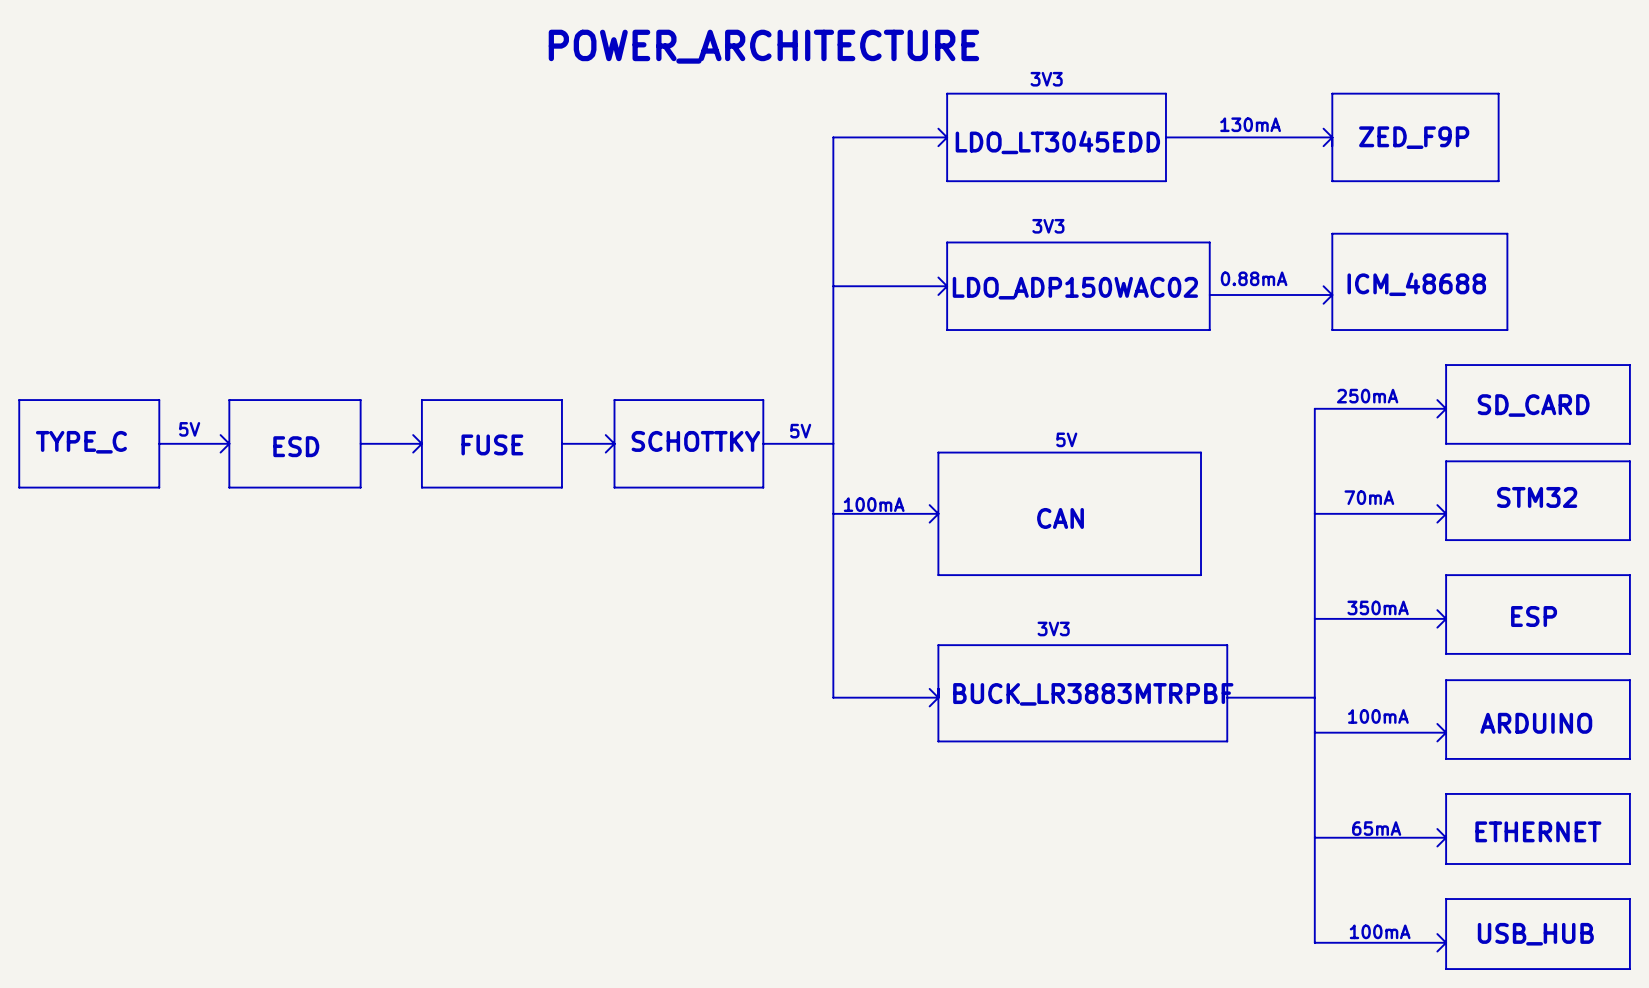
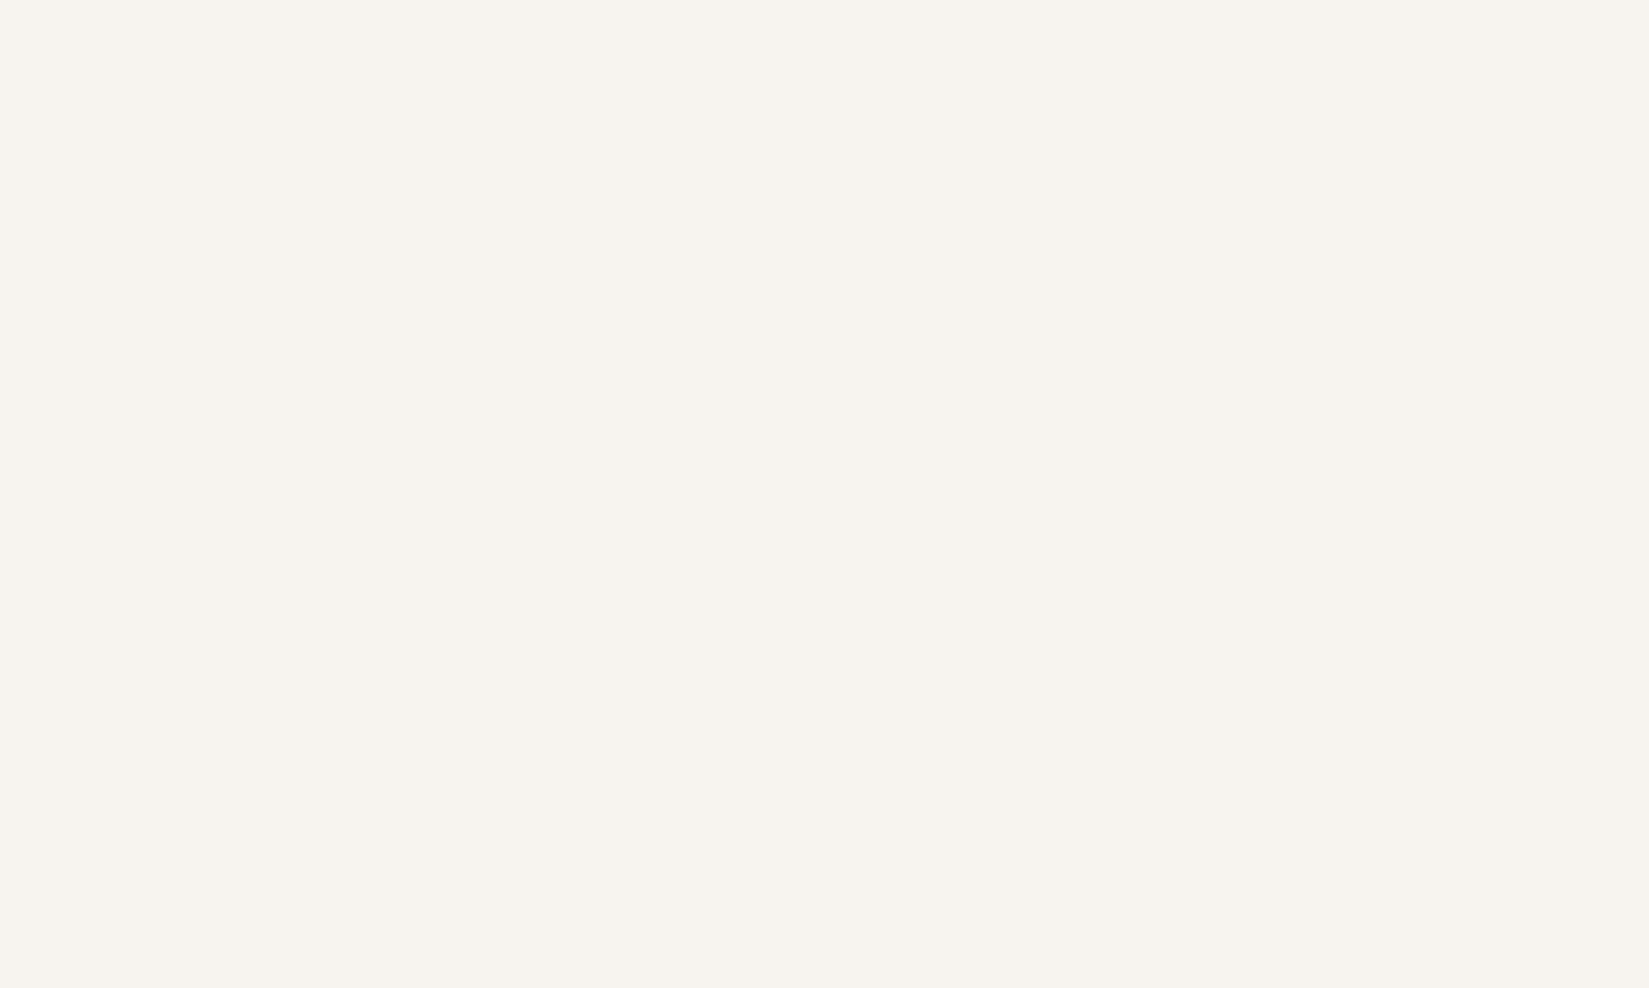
text: POWER_ARCHITECTURE (763, 46) -> none
text: 3V3 (1046, 79) -> none
line: (947, 93) (1165, 93) (1165, 181) (947, 181) (947, 93) -> none
line: (1332, 93) (1332, 181) (1498, 181) (1498, 93) (1332, 93) -> none
text: 130mA (1250, 124) -> none
line: (938, 128) (947, 137) -> none
line: (1323, 128) (1332, 137) -> none
line: (947, 137) (938, 146) -> none
line: (947, 137) (833, 137) (833, 697) (938, 697) -> none
line: (1165, 137) (1332, 137) -> none
line: (1332, 137) (1323, 146) -> none
text: ZED_F9P (1414, 137) -> none
text: LDO_LT3045EDD (1057, 142) -> none
text: 3V3 (1048, 226) -> none
line: (1332, 233) (1332, 330) (1507, 330) (1507, 233) (1332, 233) -> none
line: (947, 242) (947, 330) (1209, 330) (1209, 242) (947, 242) -> none
line: (938, 277) (947, 286) -> none
text: 0.88mA (1254, 278) -> none
text: ICM_48688 (1416, 284) -> none
line: (833, 286) (947, 286) -> none
line: (947, 286) (938, 295) -> none
line: (1323, 286) (1332, 295) -> none
text: LDO_ADP150WAC02 (1075, 288) -> none
line: (1209, 295) (1332, 295) -> none
line: (1332, 295) (1323, 303) -> none
line: (1446, 365) (1629, 365) (1629, 443) (1446, 443) (1446, 365) -> none
text: 250mA (1367, 396) -> none
line: (19, 400) (159, 400) (159, 487) (19, 487) (19, 400) -> none
line: (229, 400) (360, 400) (360, 487) (229, 487) (229, 400) -> none
line: (421, 400) (561, 400) (561, 487) (421, 487) (421, 400) -> none
line: (614, 400) (763, 400) (763, 487) (614, 487) (614, 400) -> none
line: (1437, 400) (1446, 408) -> none
text: SD_CARD (1533, 405) -> none
line: (1446, 408) (1437, 417) -> none
line: (1446, 408) (1314, 408) (1314, 942) (1446, 942) -> none
text: 5V (189, 429) -> none
text: 5V (800, 431) -> none
line: (220, 435) (229, 443) -> none
line: (413, 435) (421, 443) -> none
line: (605, 435) (614, 443) -> none
text: 5V (1066, 439) -> none
text: SCHOTTKY (695, 441) -> none
text: TYPE_C (81, 442) -> none
line: (159, 443) (229, 443) -> none
line: (229, 443) (220, 452) -> none
line: (360, 443) (421, 443) -> none
line: (421, 443) (413, 452) -> none
line: (561, 443) (614, 443) -> none
line: (614, 443) (605, 452) -> none
line: (763, 443) (833, 443) -> none
text: FUSE (492, 444) -> none
text: ESD (296, 446) -> none
line: (938, 452) (938, 575) (1201, 575) (1201, 452) (938, 452) -> none
line: (1446, 461) (1446, 540) (1629, 540) (1629, 461) (1446, 461) -> none
text: 70mA (1369, 497) -> none
text: STM32 (1537, 497) -> none
text: 100mA (874, 504) -> none
line: (929, 505) (938, 513) -> none
line: (1437, 505) (1446, 513) -> none
line: (833, 513) (938, 513) -> none
line: (938, 513) (929, 522) -> none
line: (1314, 513) (1446, 513) -> none
line: (1446, 513) (1437, 522) -> none
text: CAN (1060, 518) -> none
line: (1446, 575) (1446, 653) (1629, 653) (1629, 575) (1446, 575) -> none
text: 350mA (1378, 607) -> none
line: (1437, 610) (1446, 618) -> none
text: ESP (1534, 616) -> none
line: (1314, 618) (1446, 618) -> none
line: (1446, 618) (1437, 627) -> none
text: 3V3 (1053, 628) -> none
line: (938, 645) (938, 741) (1227, 741) (1227, 645) (938, 645) -> none
line: (1446, 680) (1446, 758) (1629, 758) (1629, 680) (1446, 680) -> none
line: (929, 688) (938, 697) -> none
text: BUCK_LR3883MTRPBF (1093, 694) -> none
line: (938, 697) (929, 706) -> none
line: (1227, 697) (1314, 697) -> none
text: 100mA (1378, 716) -> none
line: (1437, 723) (1446, 732) -> none
text: ARDUINO (1536, 723) -> none
line: (1314, 732) (1446, 732) -> none
line: (1446, 732) (1437, 741) -> none
line: (1446, 793) (1446, 863) (1629, 863) (1629, 793) (1446, 793) -> none
text: 65mA (1376, 828) -> none
line: (1437, 828) (1446, 837) -> none
text: ETHERNET (1538, 831) -> none
line: (1314, 837) (1446, 837) -> none
line: (1446, 837) (1437, 846) -> none
line: (1446, 899) (1446, 969) (1629, 969) (1629, 899) (1446, 899) -> none
text: 100mA (1380, 931) -> none
line: (1437, 934) (1446, 942) -> none
text: USB_HUB (1535, 934) -> none
line: (1446, 942) (1437, 951) -> none

